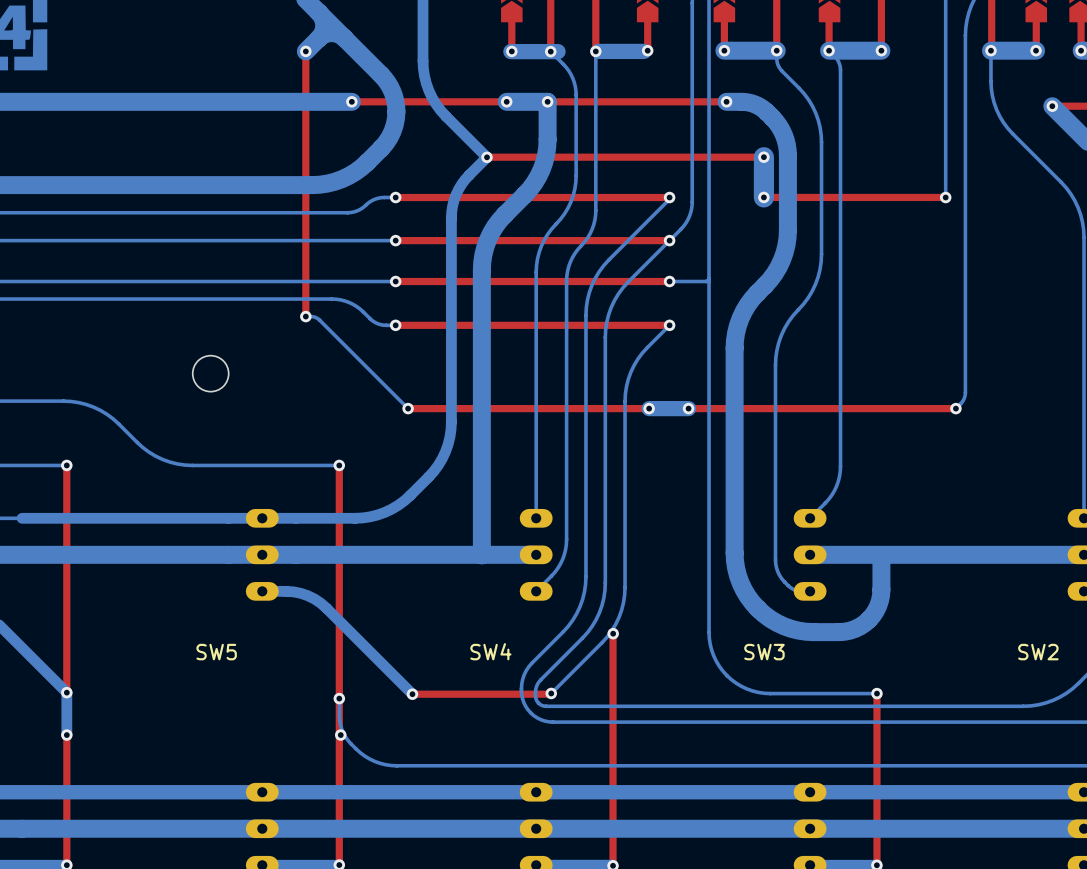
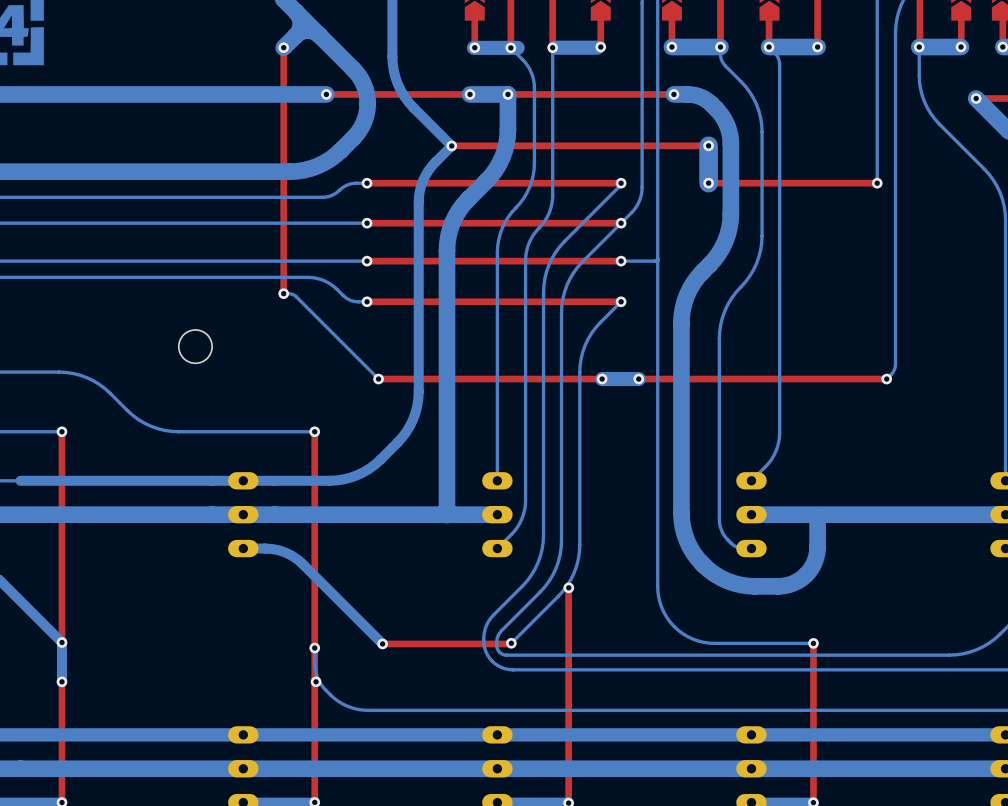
SW4 name: SW4 (490, 651) -> none
SW5 name: SW5 (216, 652) -> none
SW3 name: SW3 (764, 652) -> none
SW2 name: SW2 (1038, 652) -> none

